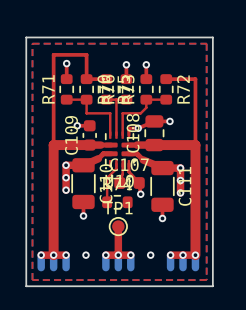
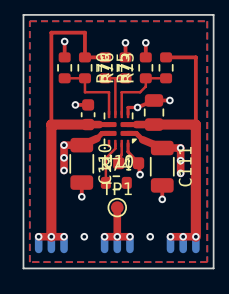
R71 name: R71 (48, 89) -> none
R72 name: R72 (183, 89) -> none
C108 name: C108 (133, 133) -> none
C109 name: C109 (71, 135) -> none
C107 name: C107 (129, 164) -> none

